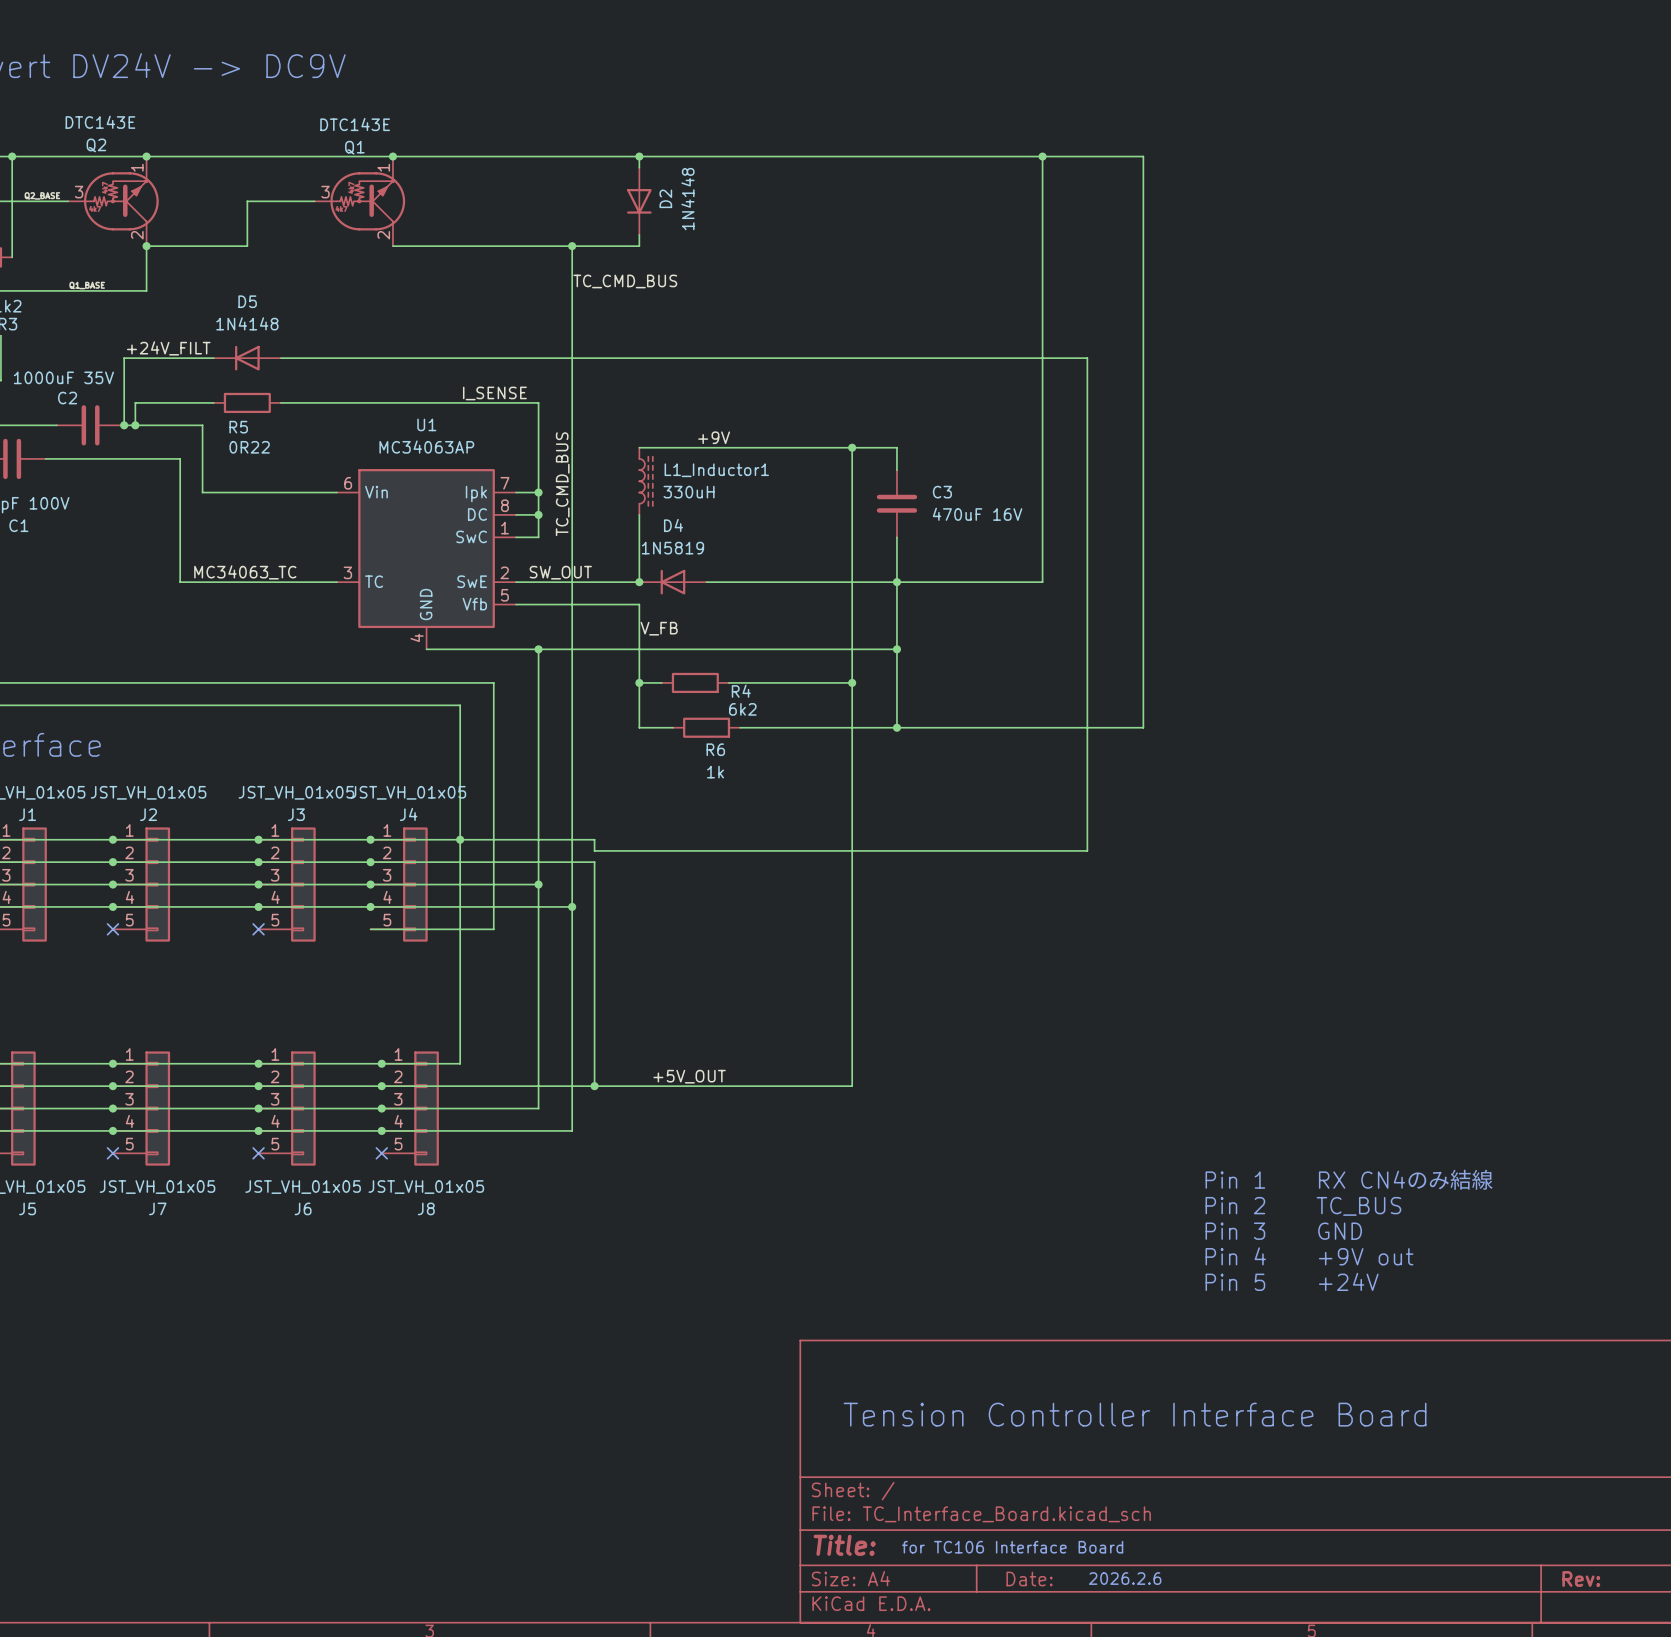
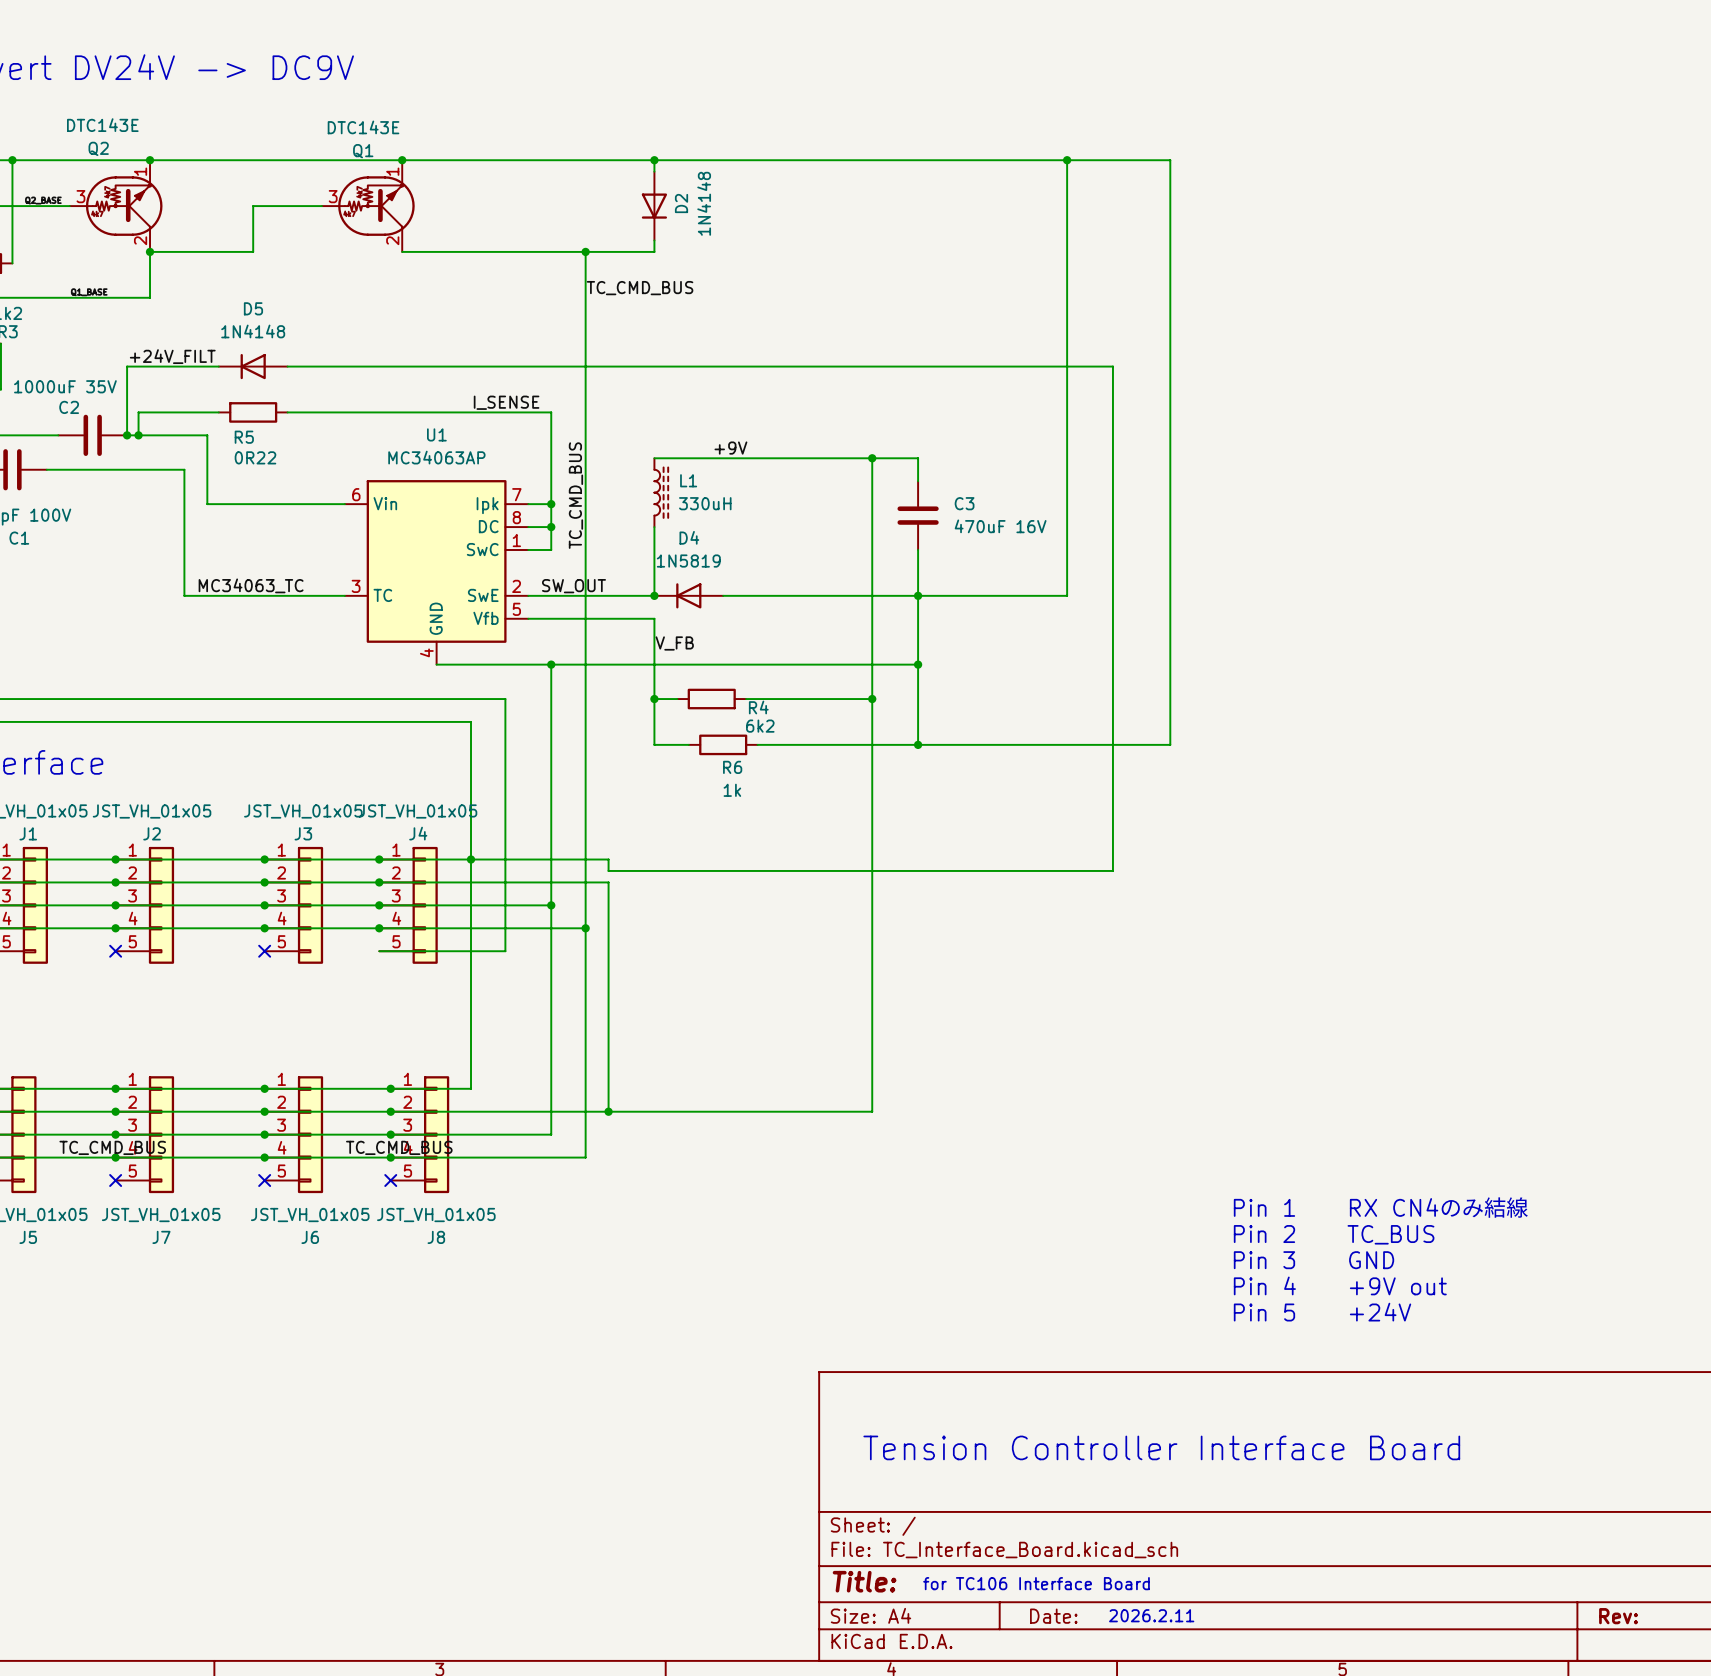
L1_Inductor1 name: L1_Inductor1 (716, 470) -> L1 (688, 480)
label: +5V_OUT (689, 1076) -> none
label: none -> TC_CMD_BUS (112, 1147)
label: none -> TC_CMD_BUS (399, 1147)
text: 2026.2.6 (1125, 1578) -> 2026.2.11 (1151, 1615)

